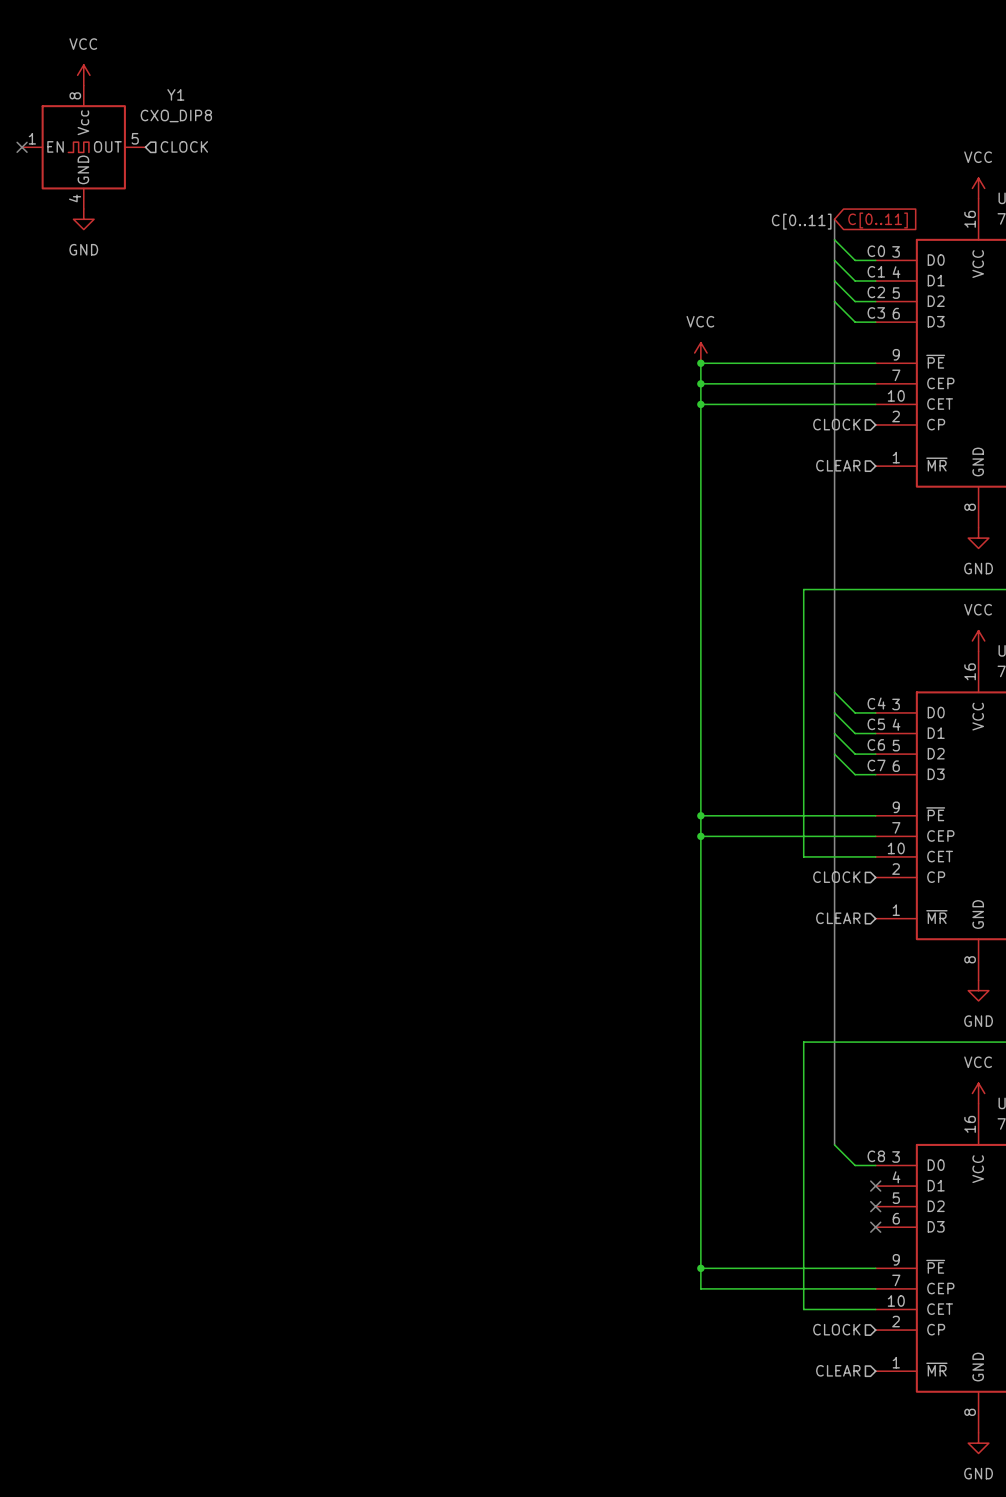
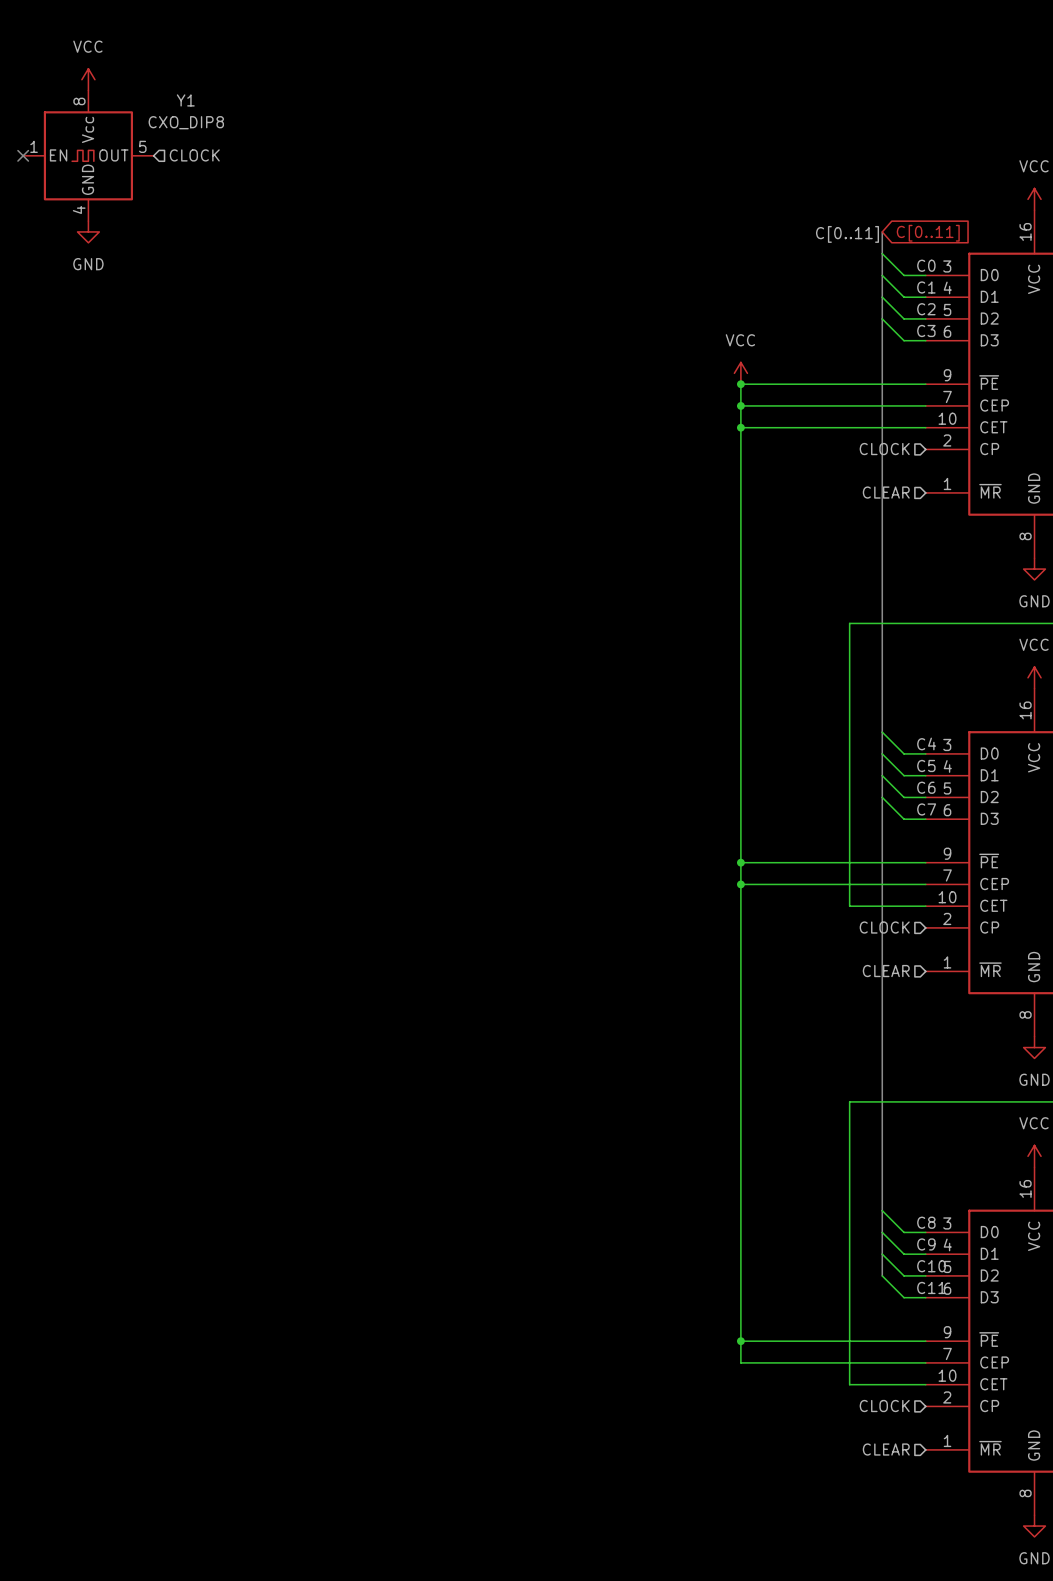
bus: none -> (882, 1210) (882, 1275)
wire: none -> (882, 1232) (904, 1254) (925, 1254)
label: none -> C9 (926, 1244)
wire: none -> (882, 1254) (904, 1275) (925, 1275)
no-connect mark: (875, 1186) -> none
label: none -> C10 (931, 1266)
wire: none -> (882, 1275) (904, 1297) (925, 1297)
no-connect mark: (875, 1206) -> none
label: none -> C11 (931, 1287)
no-connect mark: (875, 1227) -> none

